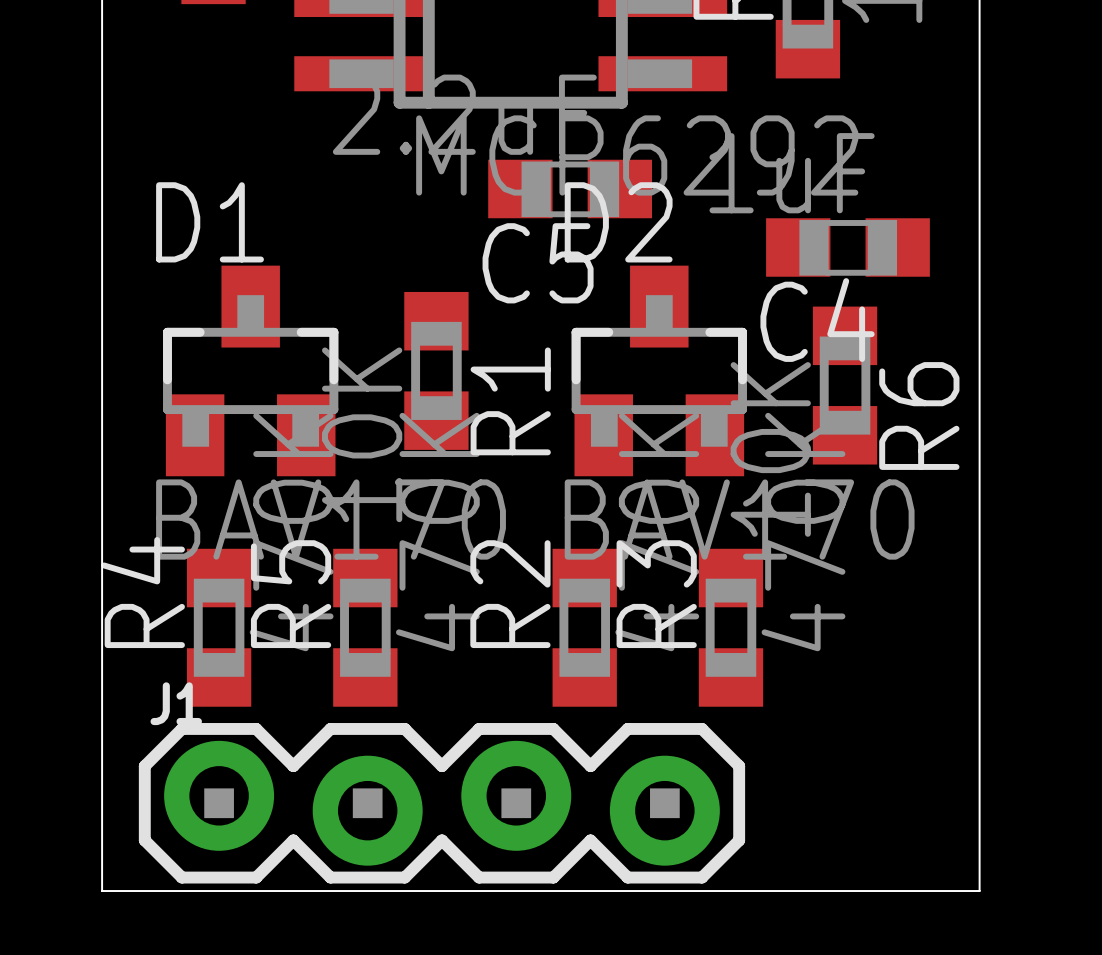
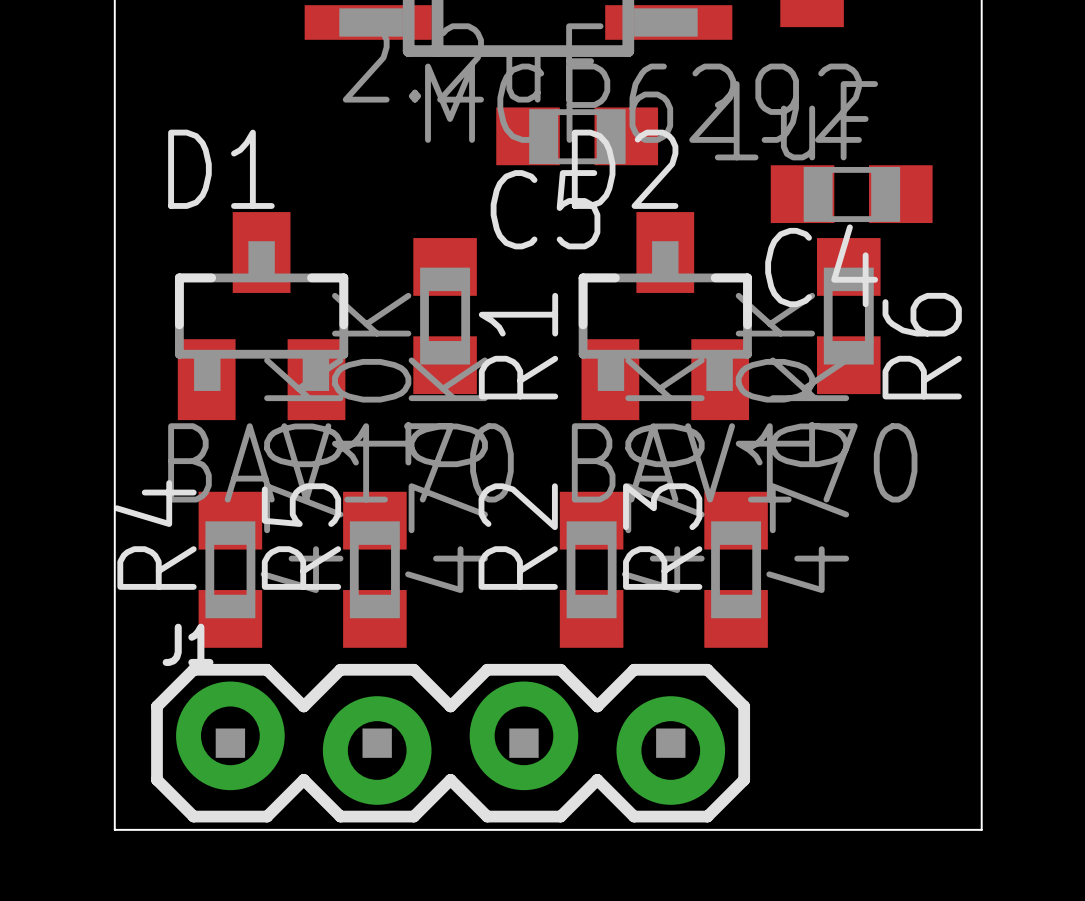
R6 position: (845, 385) -> (848, 316)

